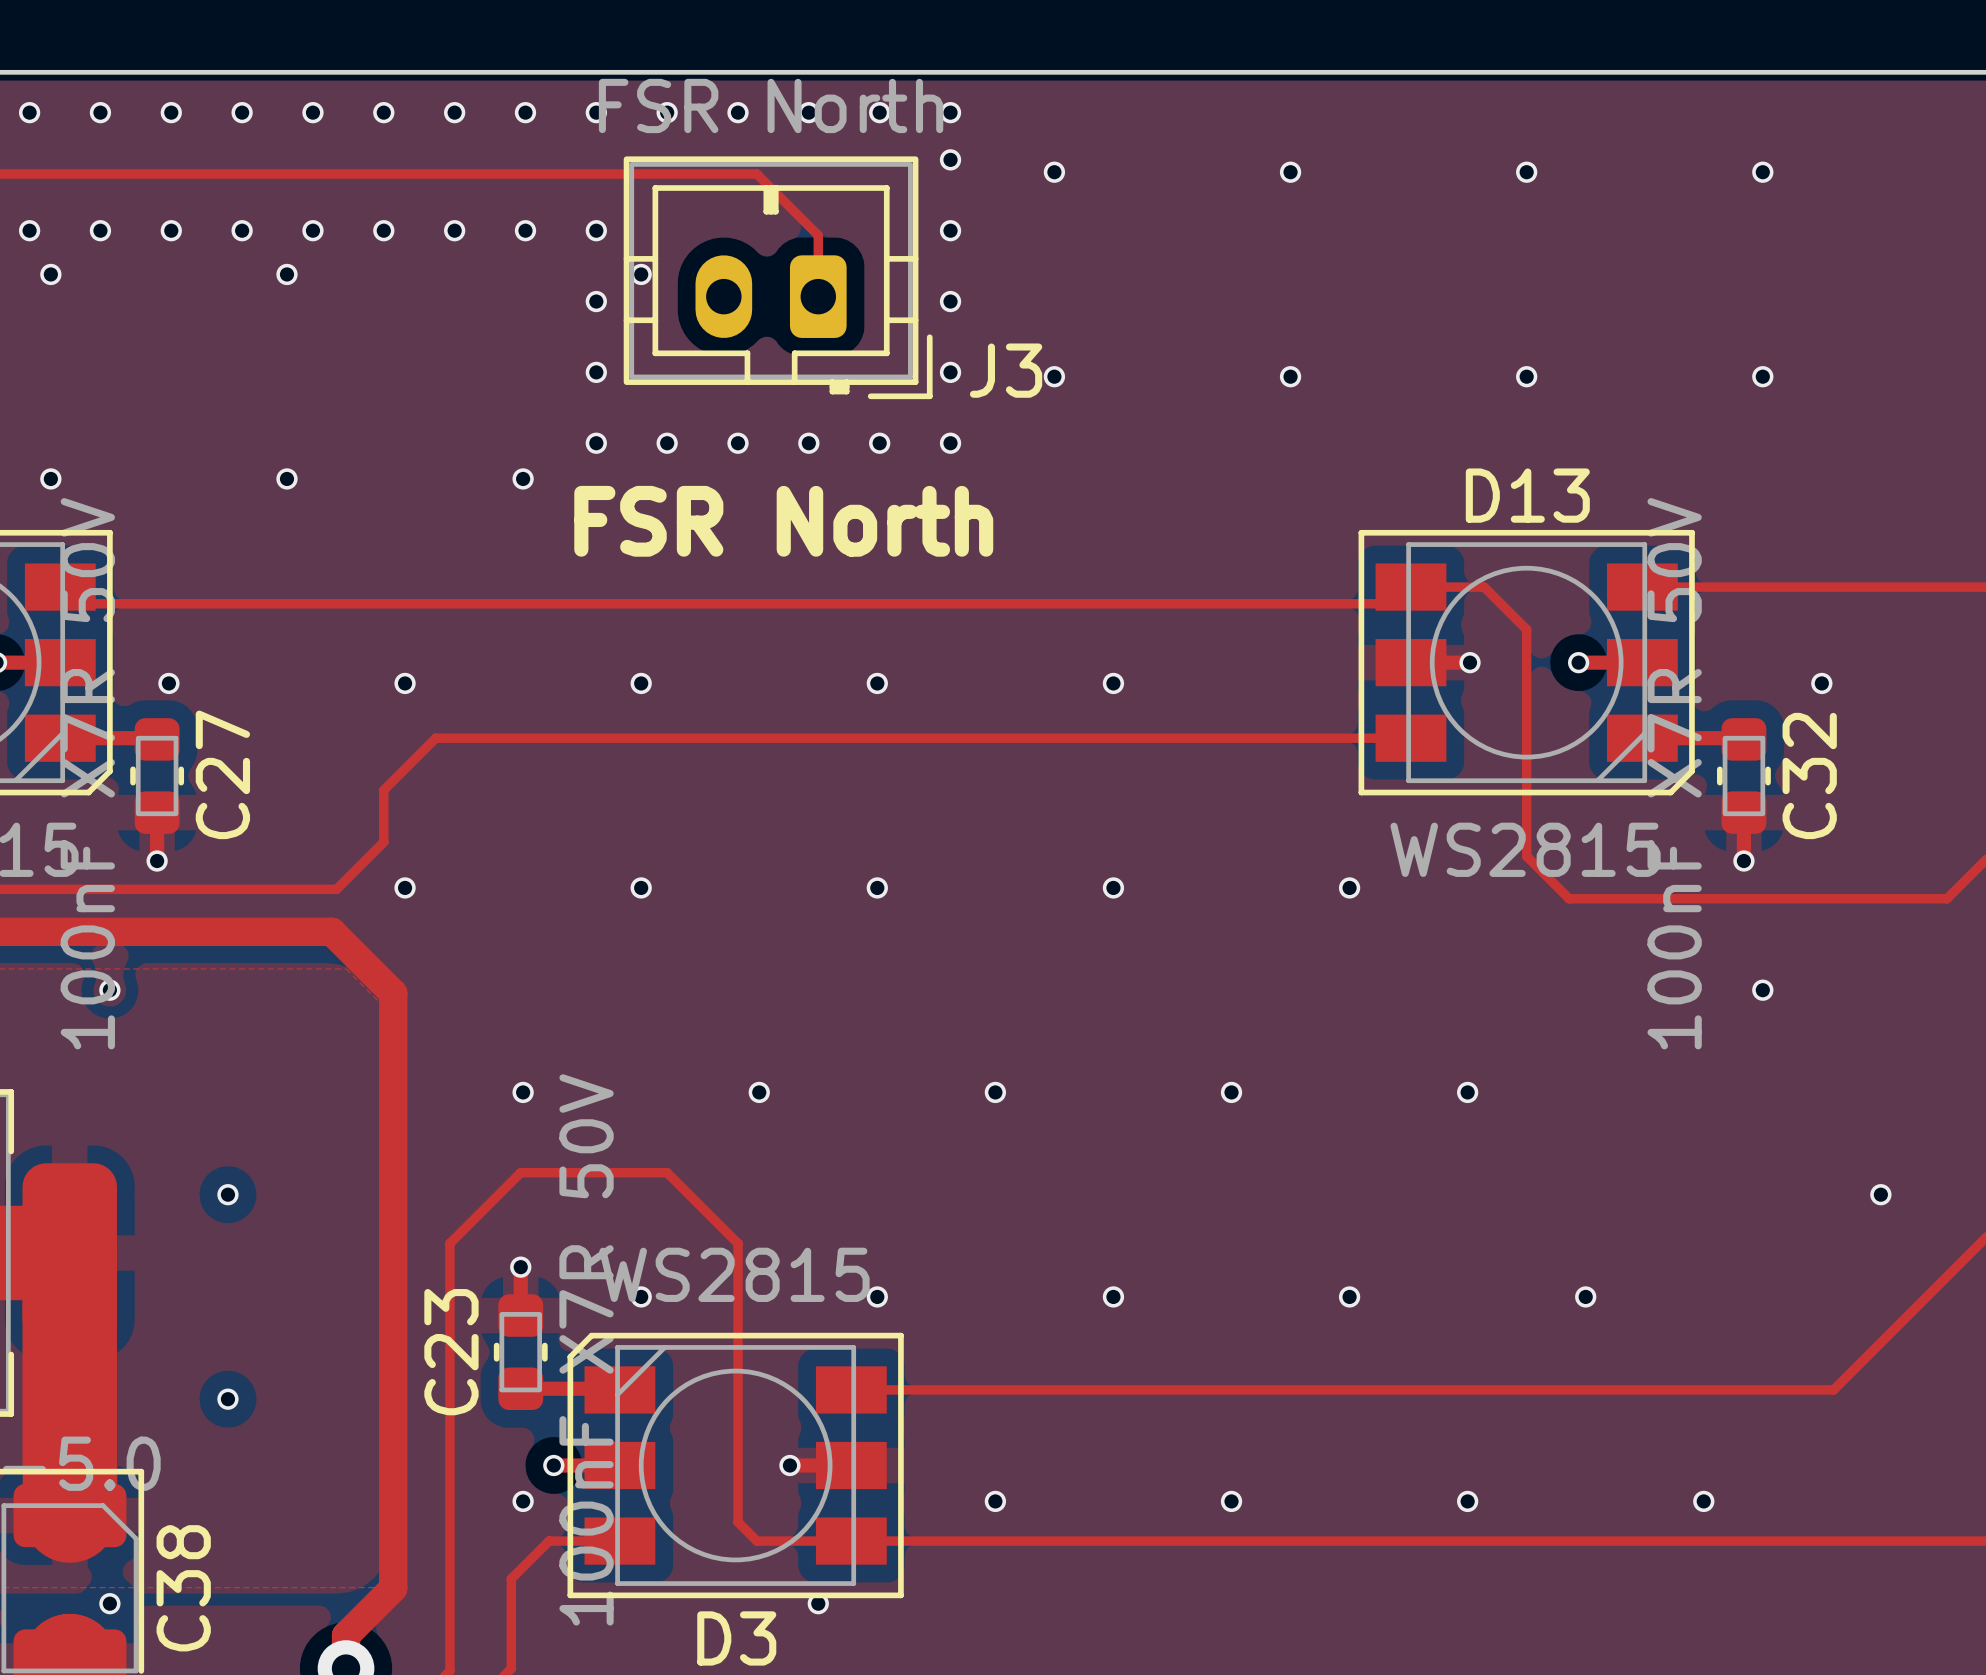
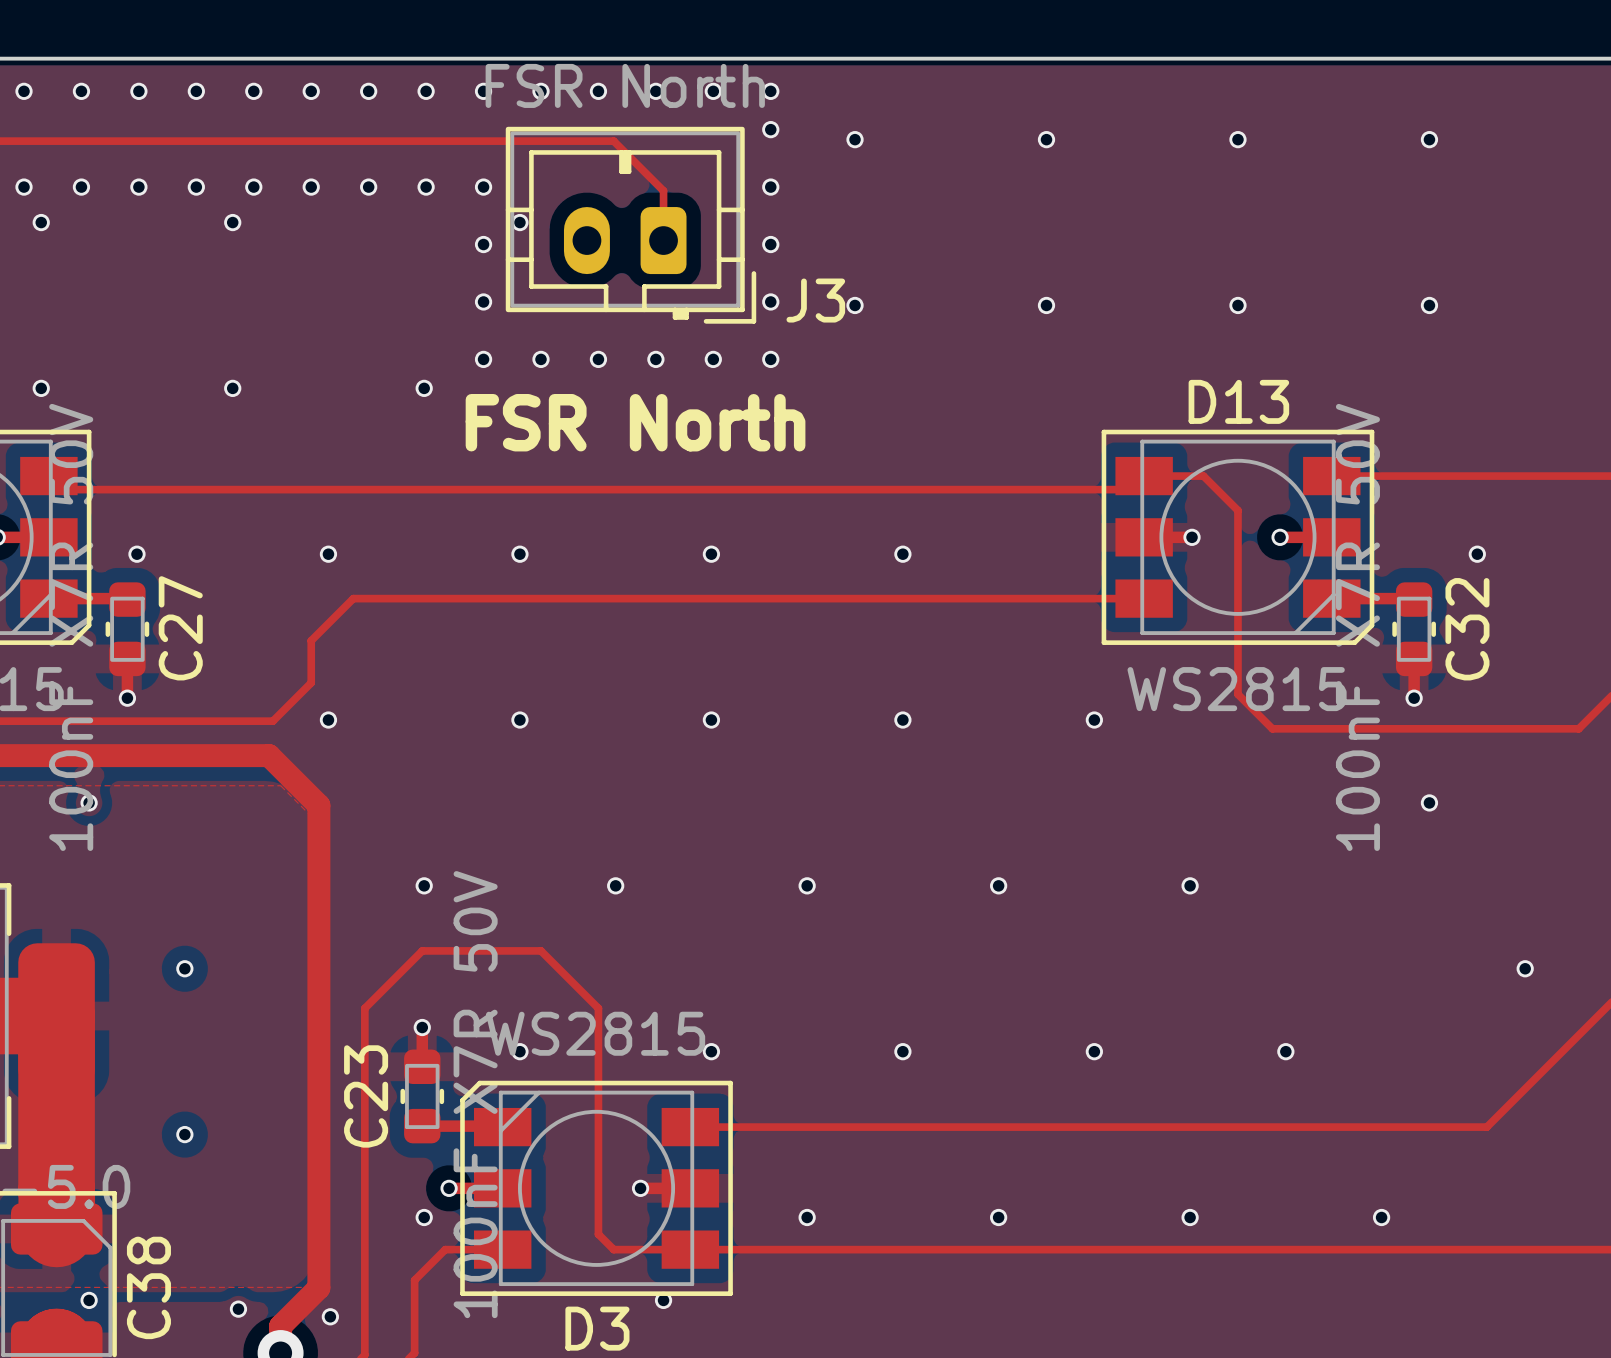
via: none -> (238, 1309)
via: none -> (330, 1316)

